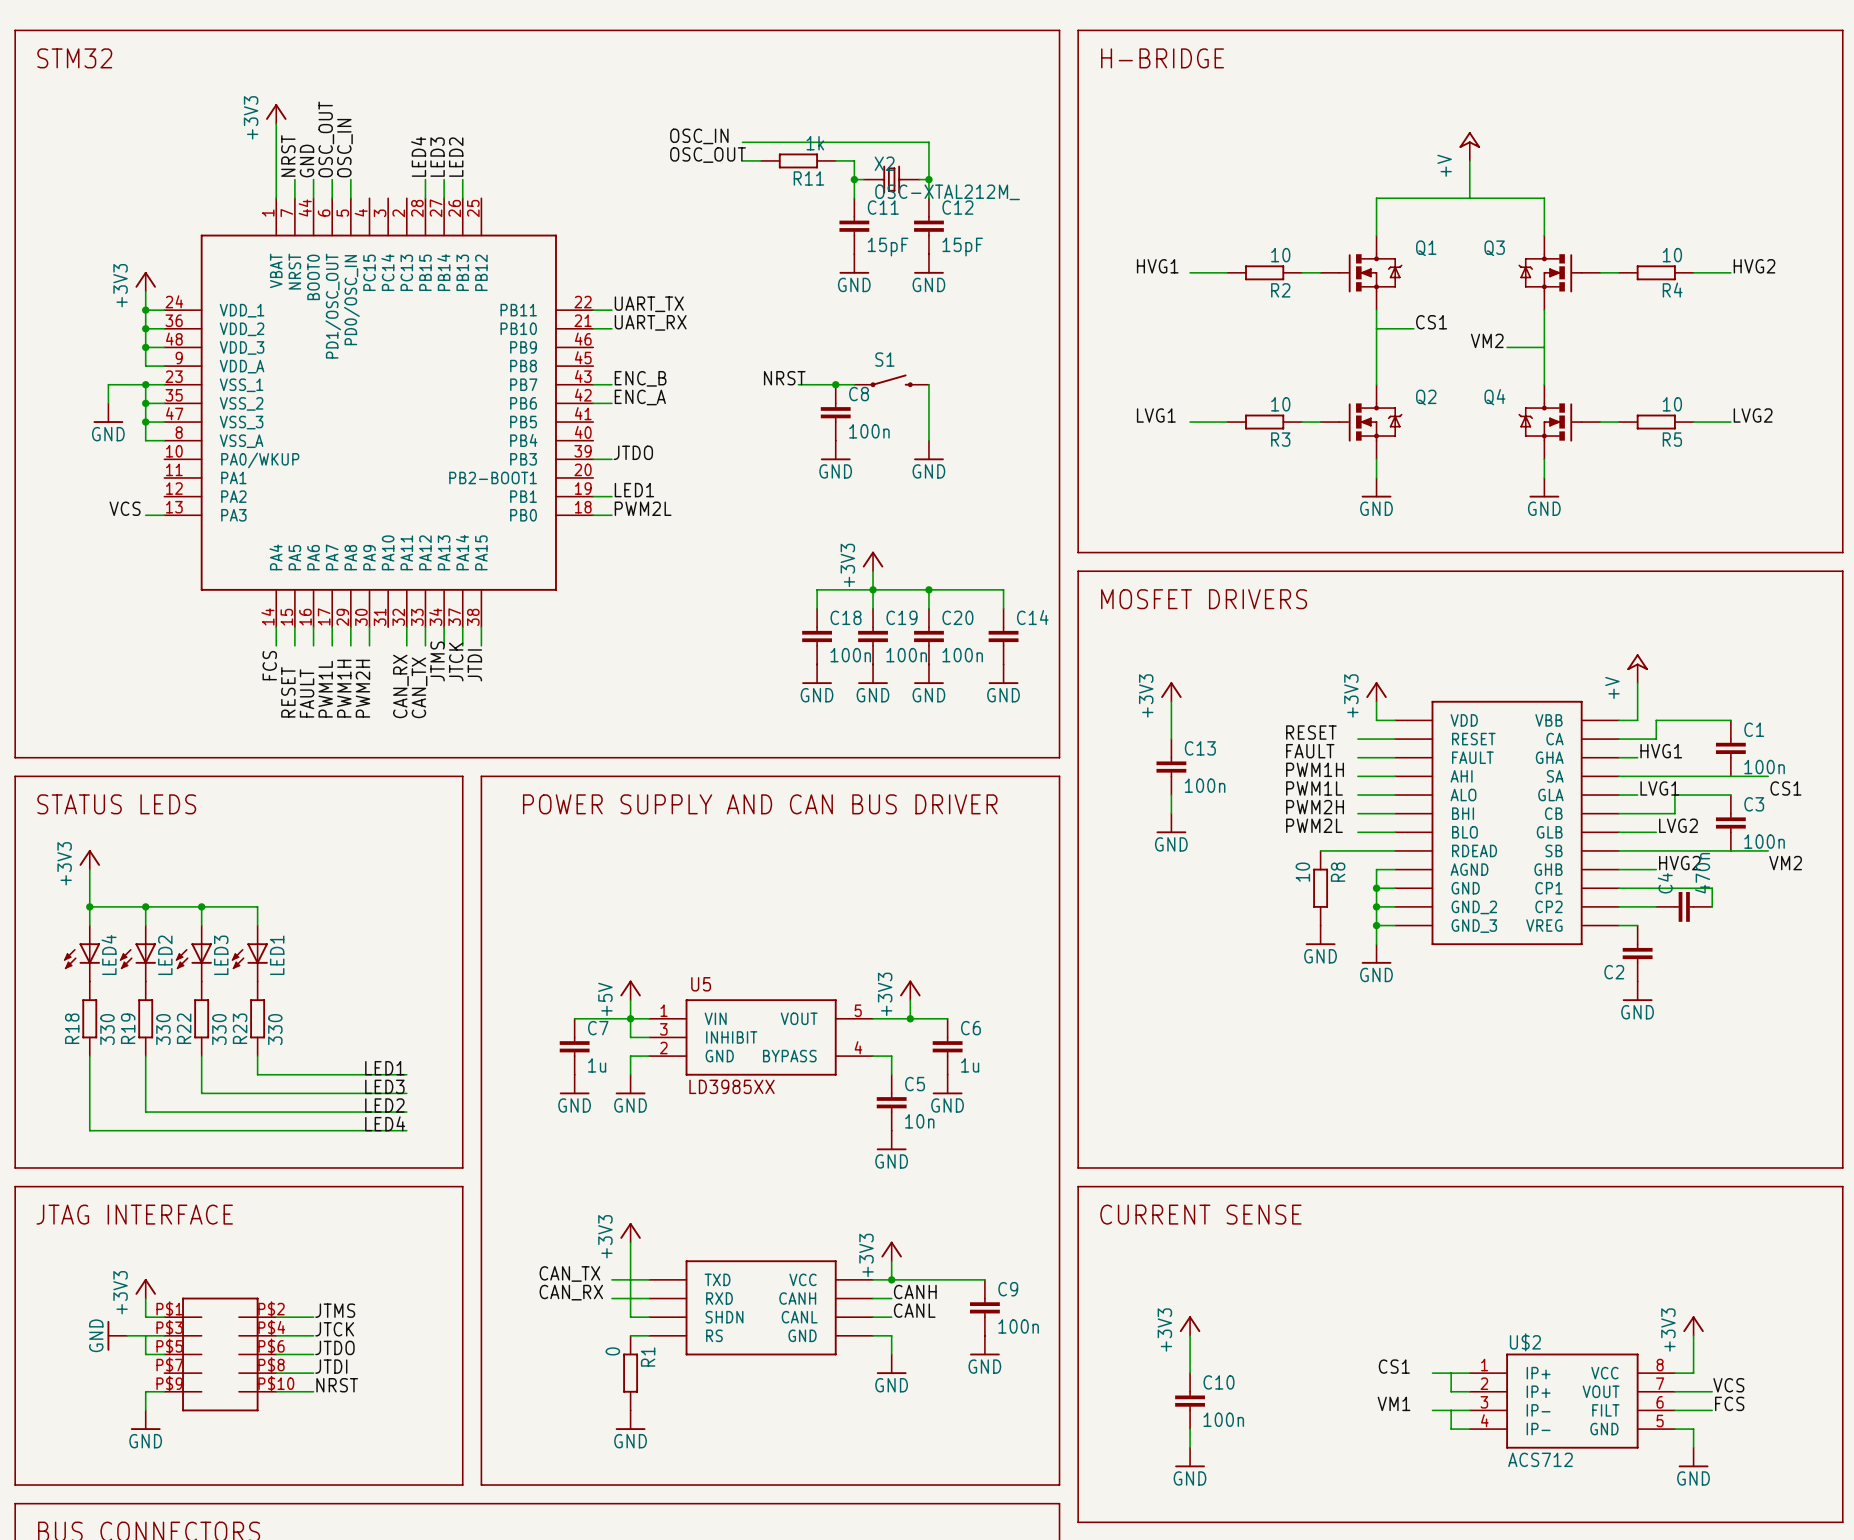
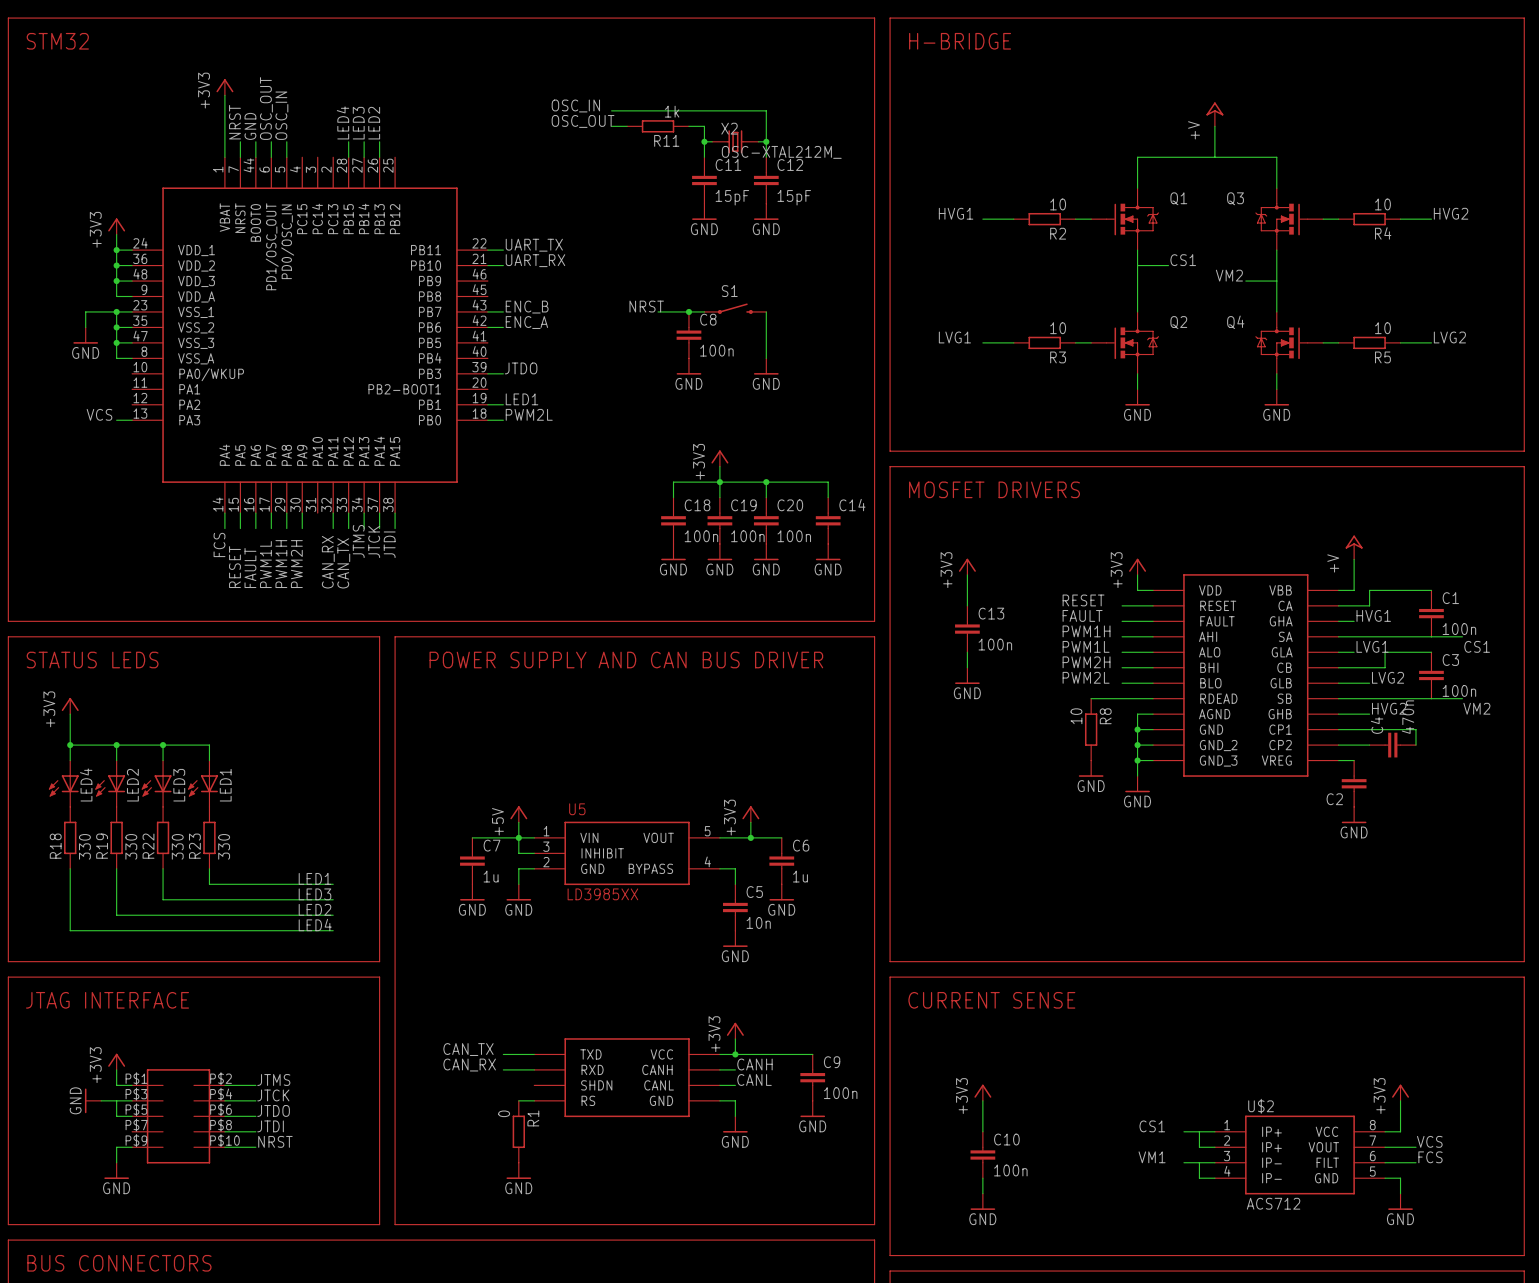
power symbol: +3V3 (630, 1232) -> none
wire: (630, 1242) (630, 1317) (649, 1317) -> none

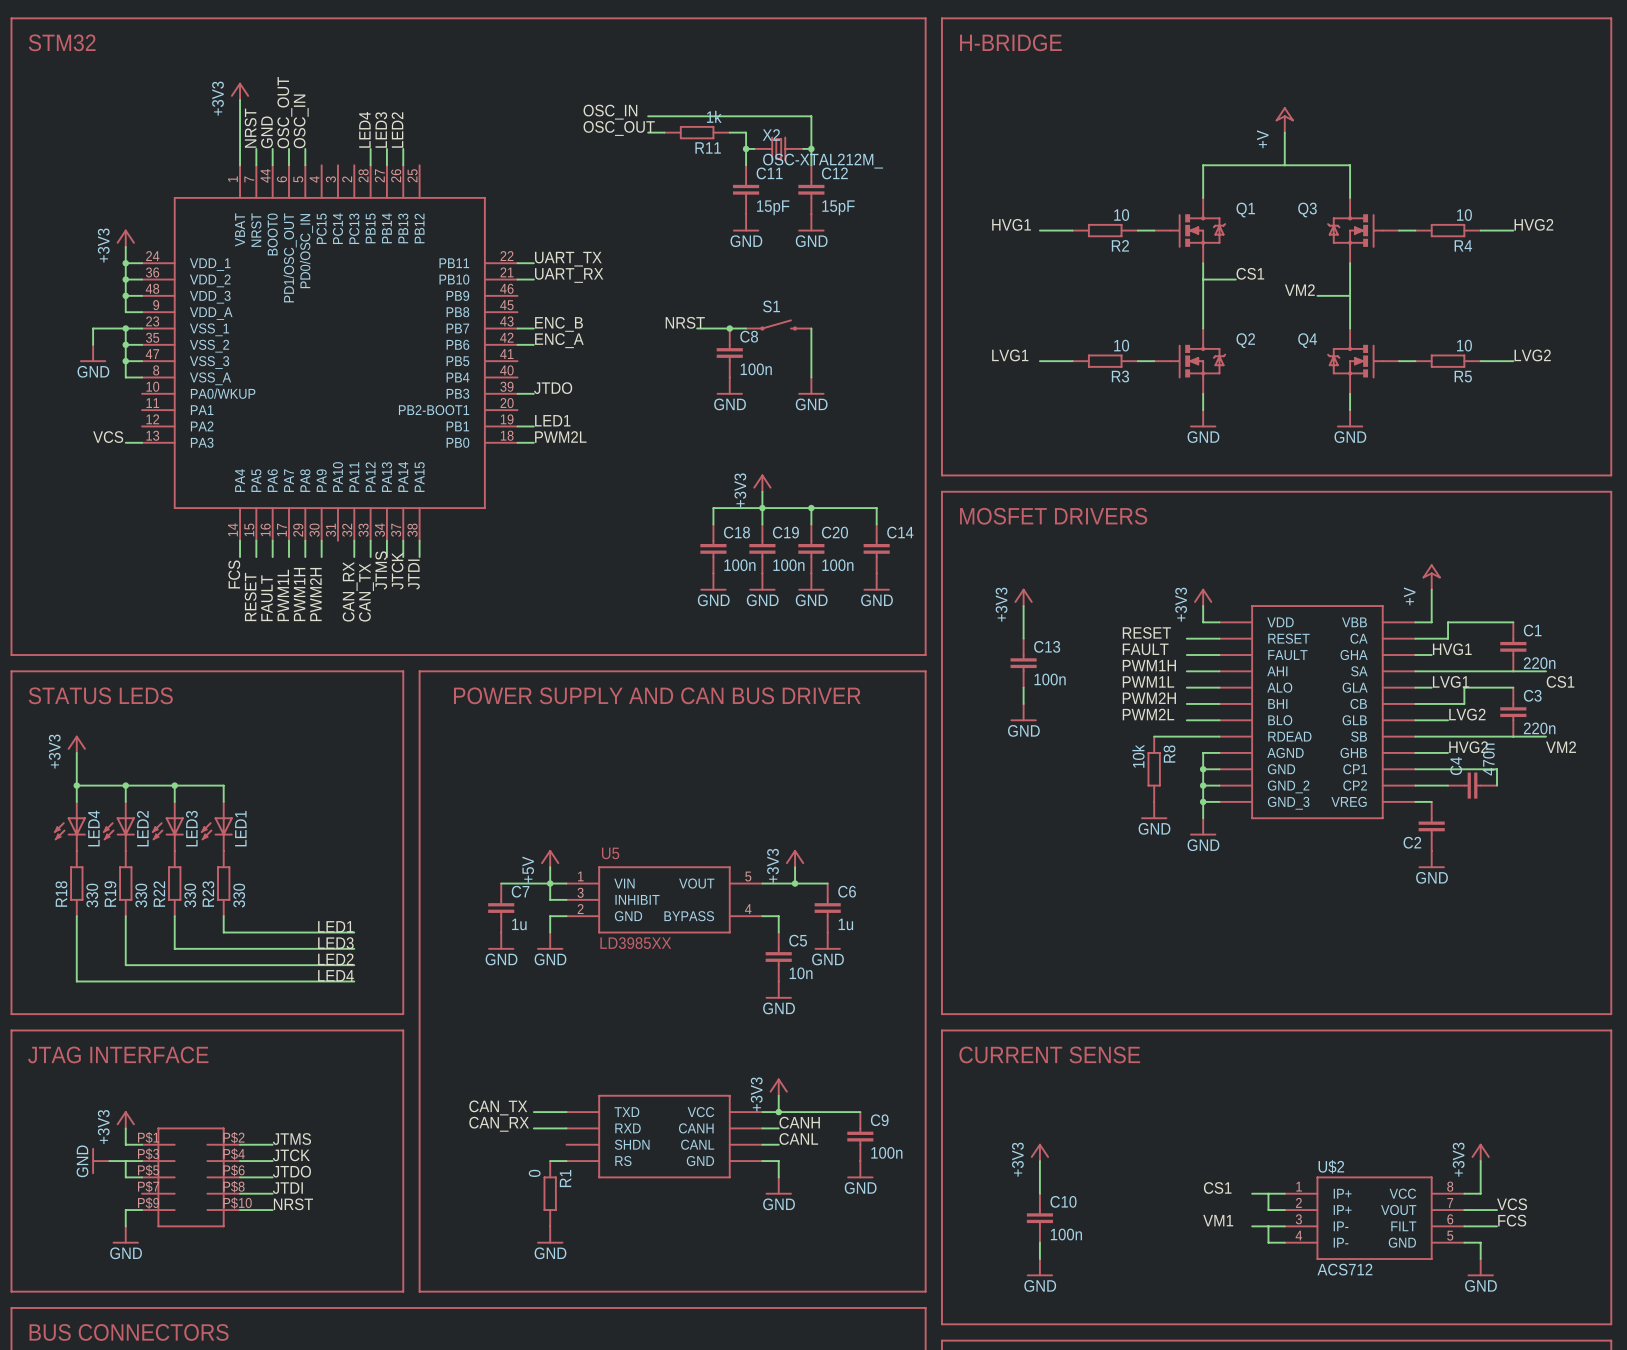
C1 value: 100n (1459, 629) -> 220n (1539, 663)
C3 value: 100n (1459, 690) -> 220n (1539, 728)
R8 value: 10 (1076, 716) -> 10k (1138, 756)

